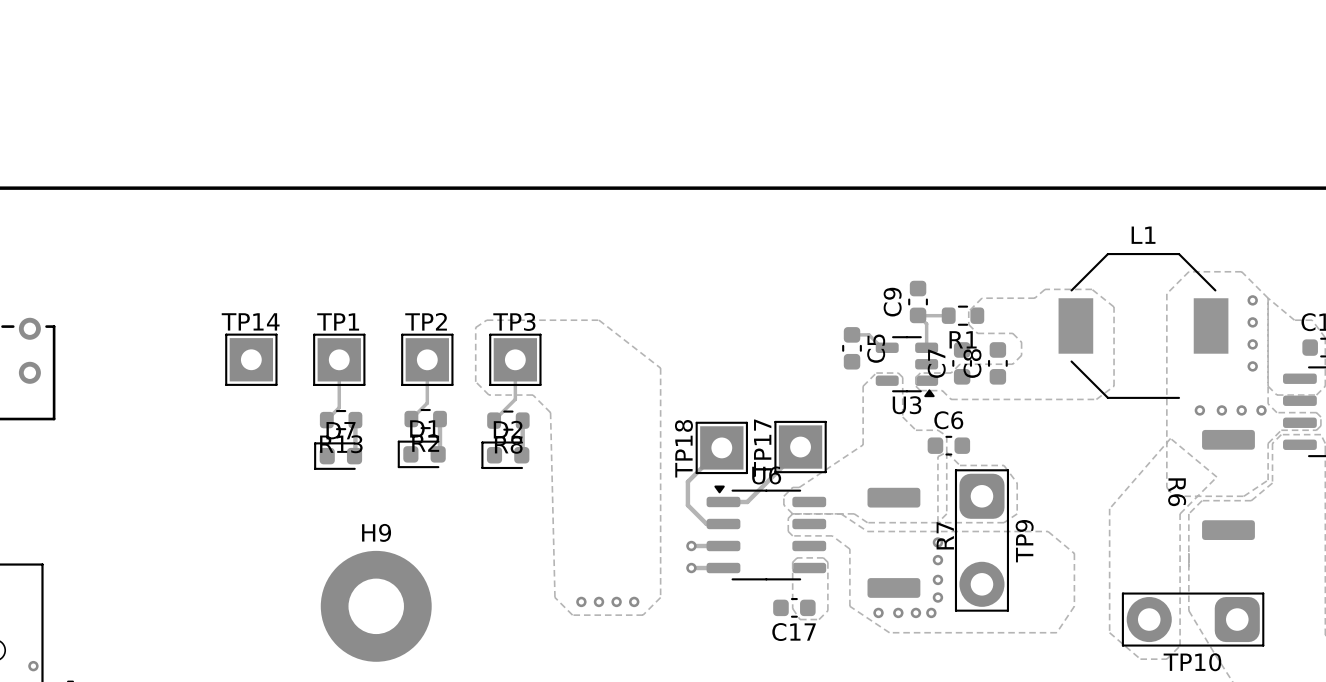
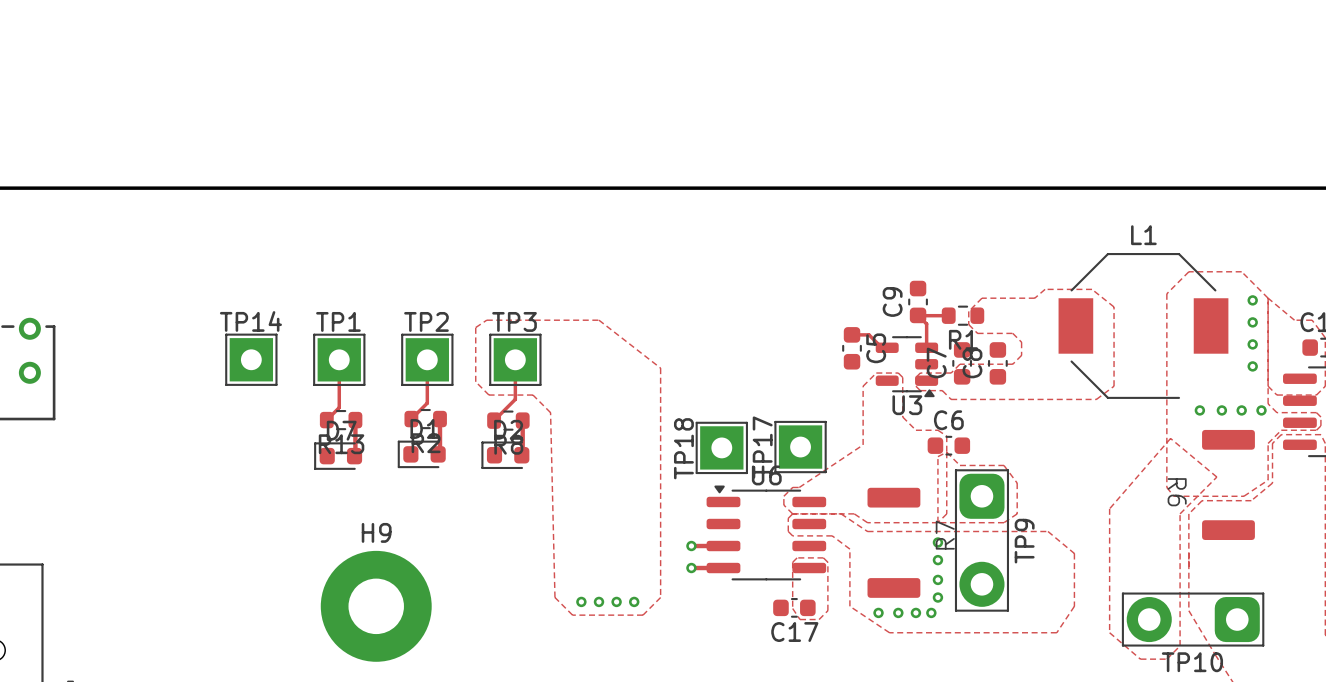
track: (721, 447) (687, 481) (687, 505) (706, 523) (723, 523) -> none
track: (801, 447) (747, 501) (723, 501) -> none
via: (33, 666) -> none

